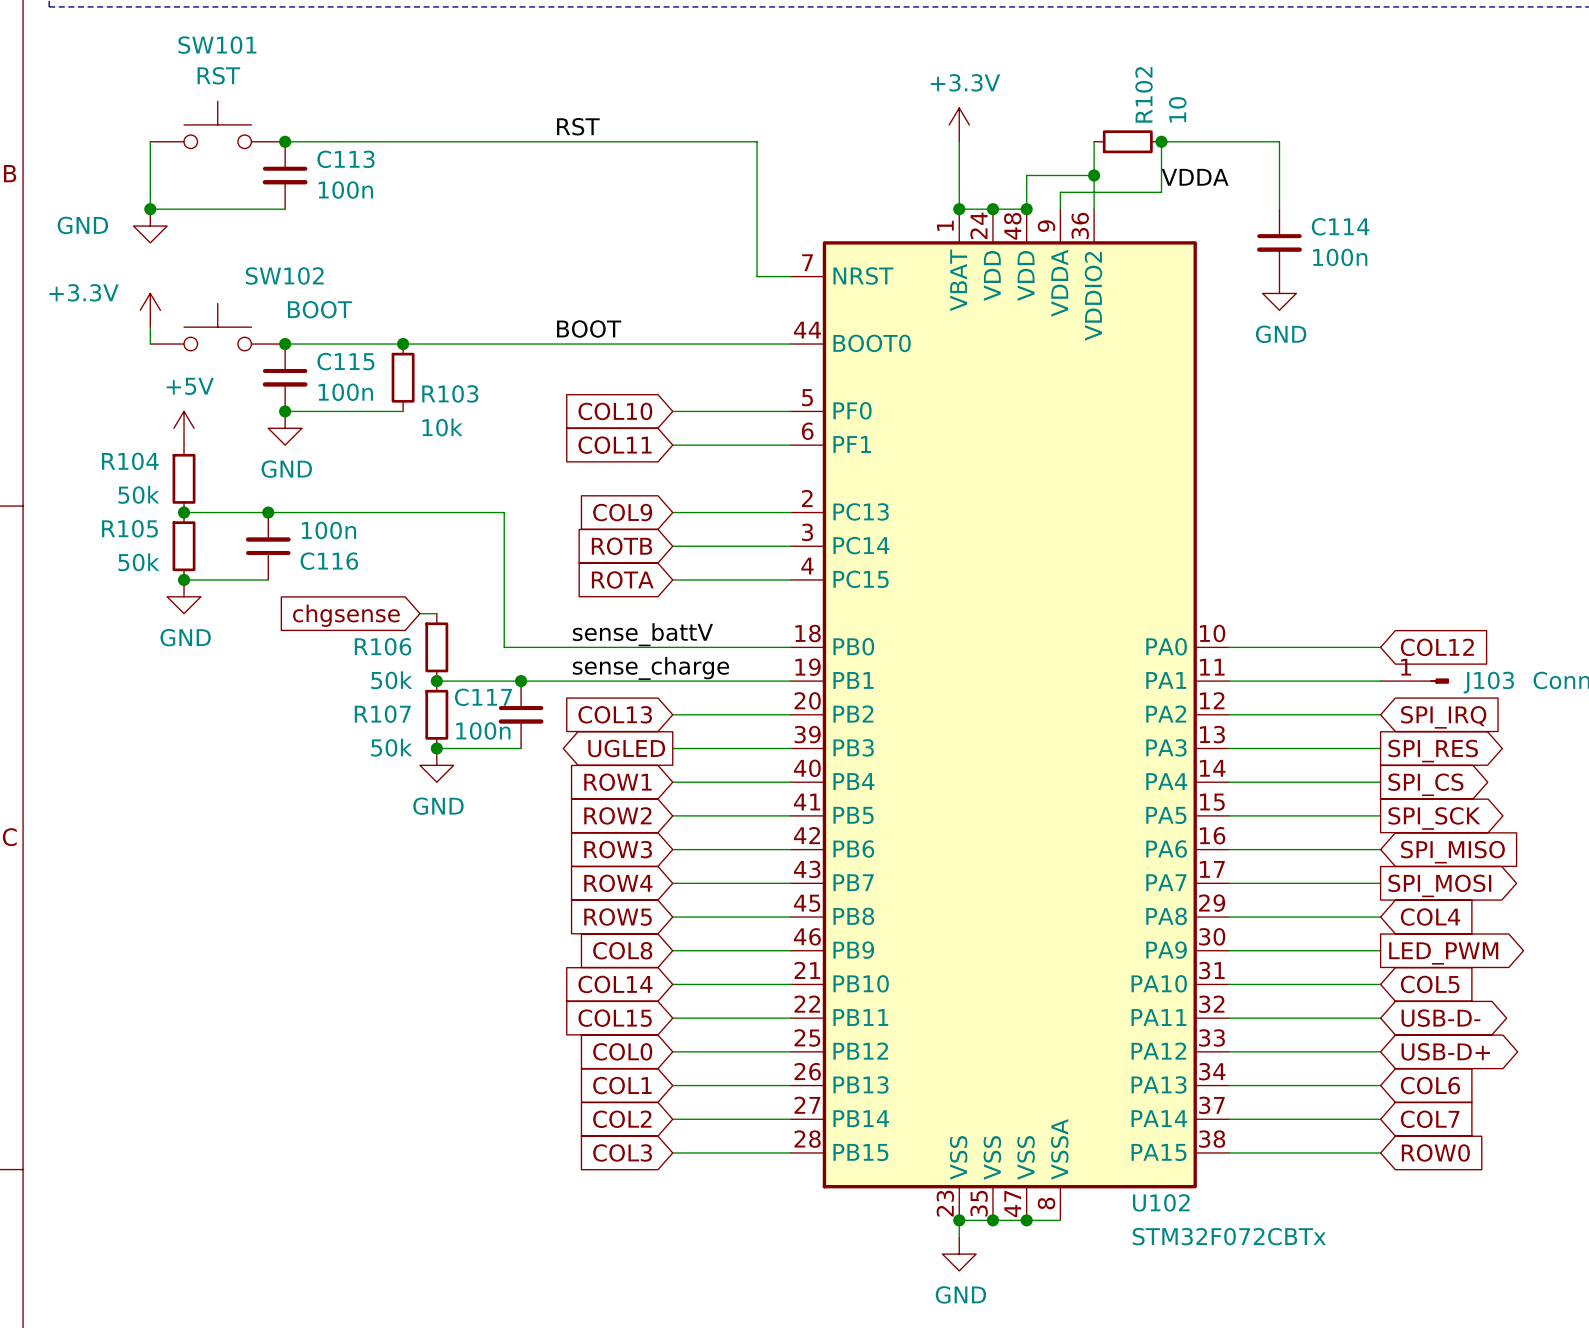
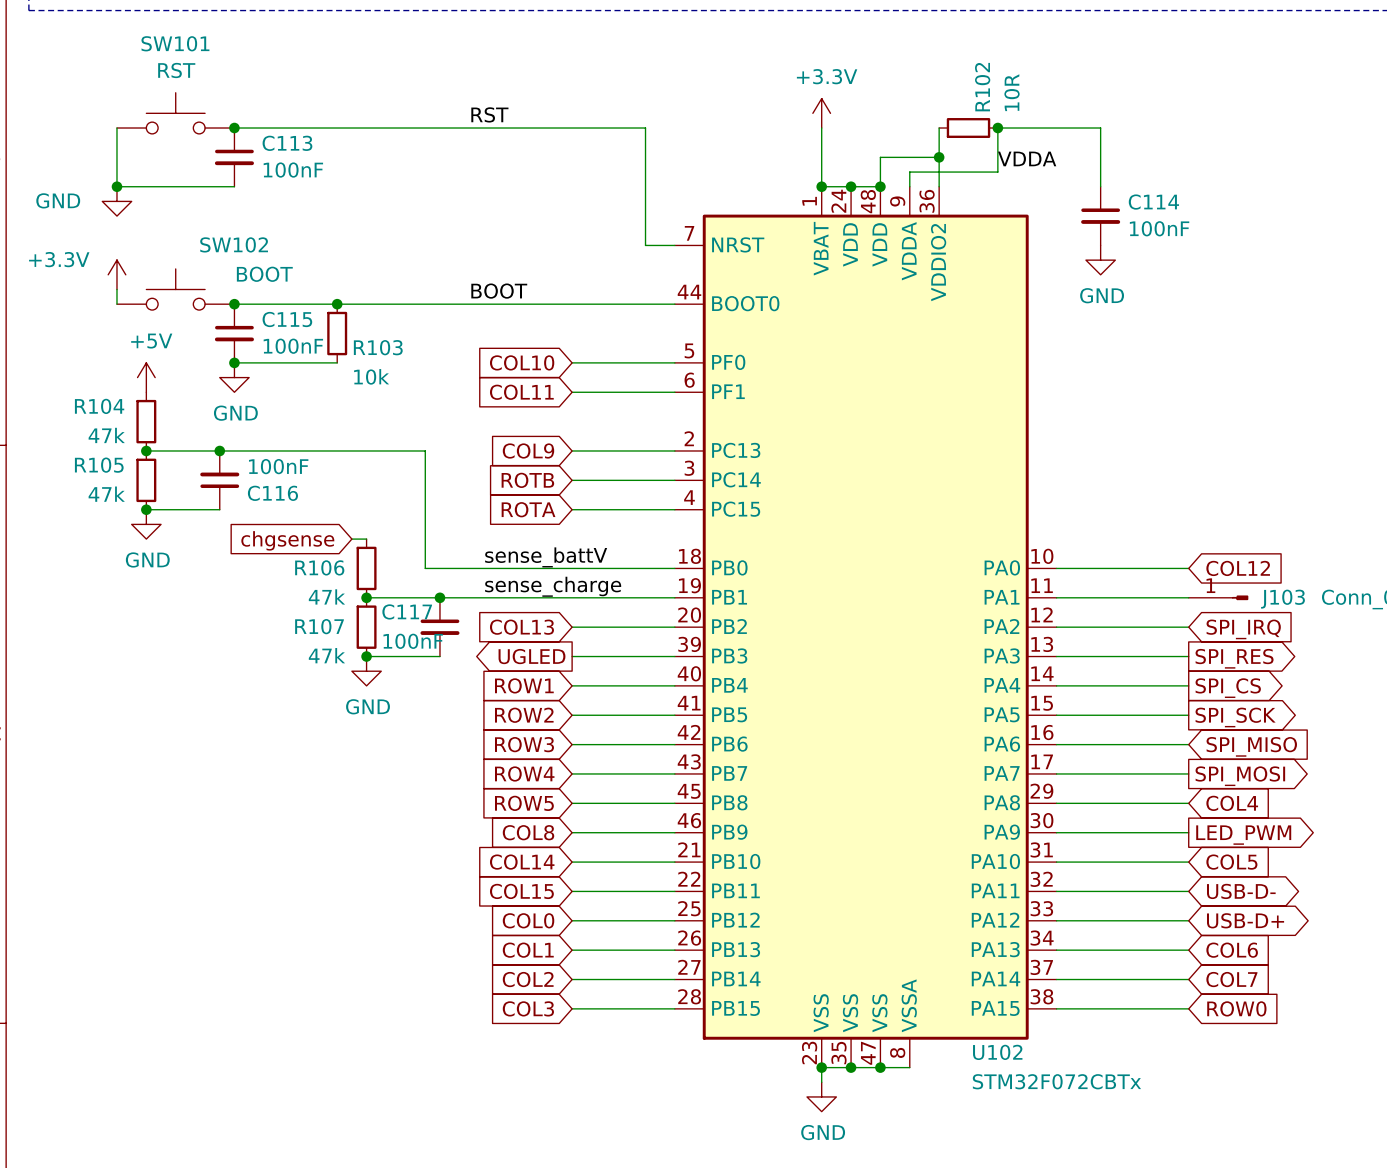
R102 value: 10 (1177, 109) -> 10R (1012, 92)
C113 value: 100n (345, 190) -> 100nF (293, 170)
C114 value: 100n (1340, 257) -> 100nF (1159, 228)
C115 value: 100n (345, 392) -> 100nF (293, 346)
R104 value: 50k (138, 494) -> 47k (106, 435)
C116 value: 100n (328, 530) -> 100nF (278, 466)
R105 value: 50k (138, 562) -> 47k (106, 494)
R106 value: 50k (391, 680) -> 47k (326, 596)
C117 value: 100n (483, 731) -> 100nF (413, 641)
R107 value: 50k (391, 747) -> 47k (326, 655)

